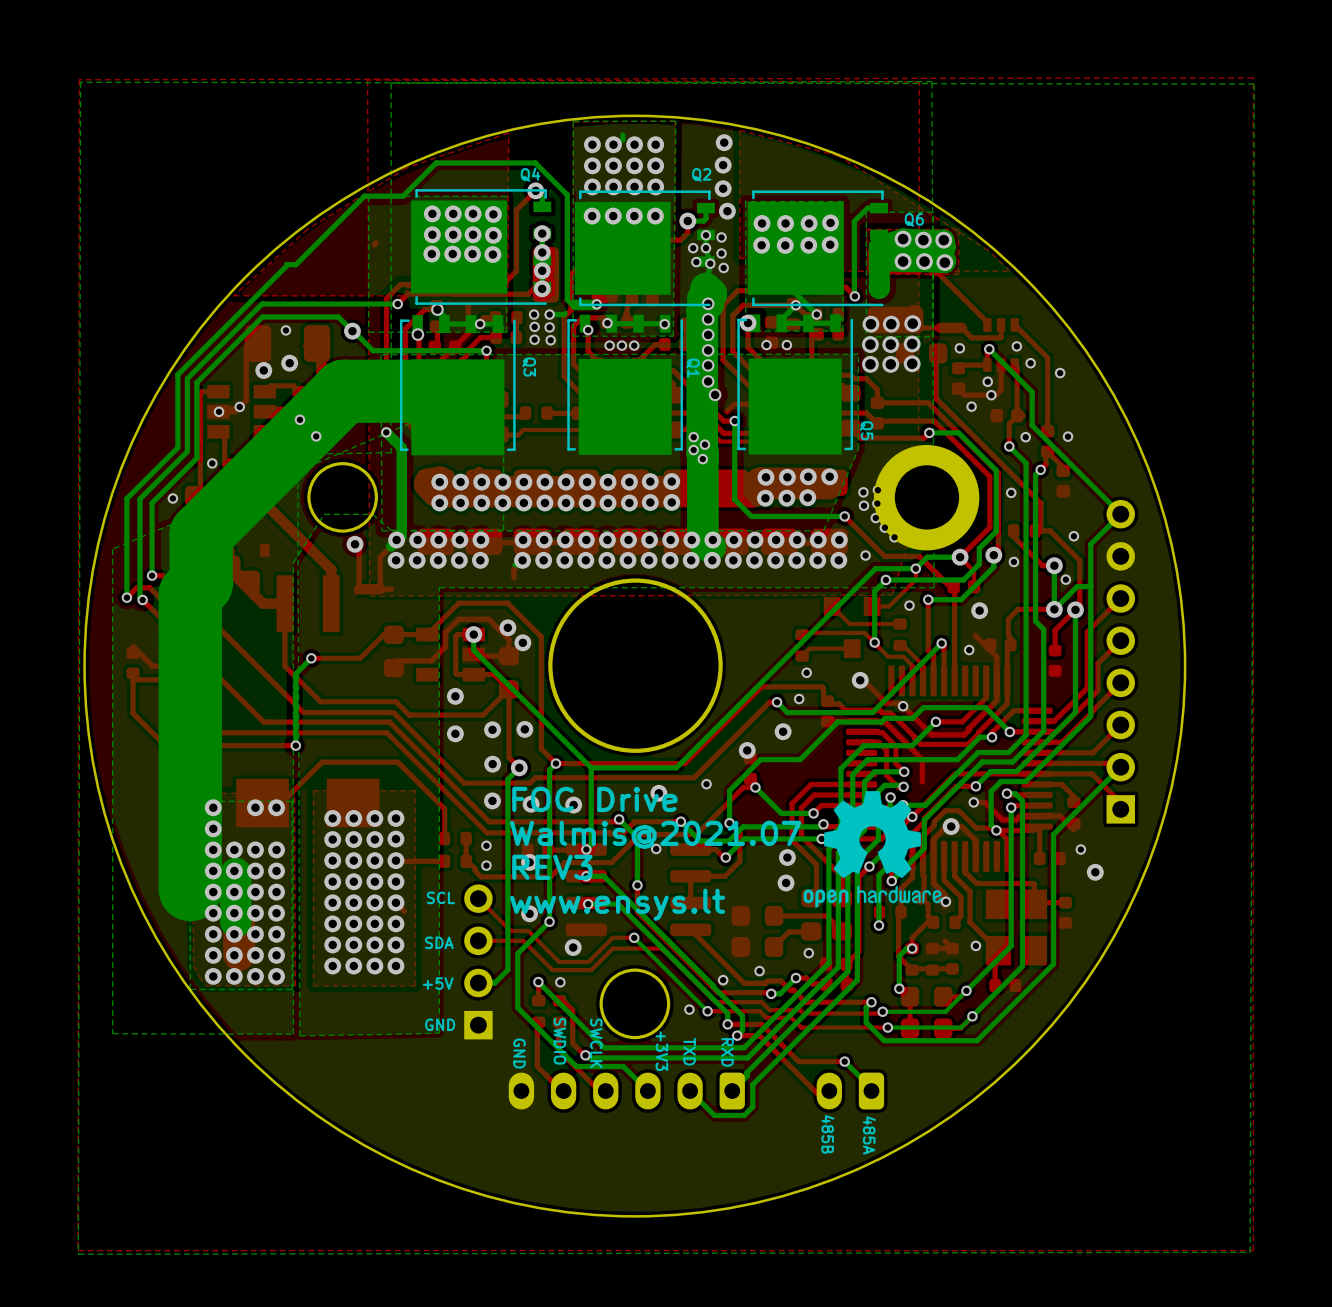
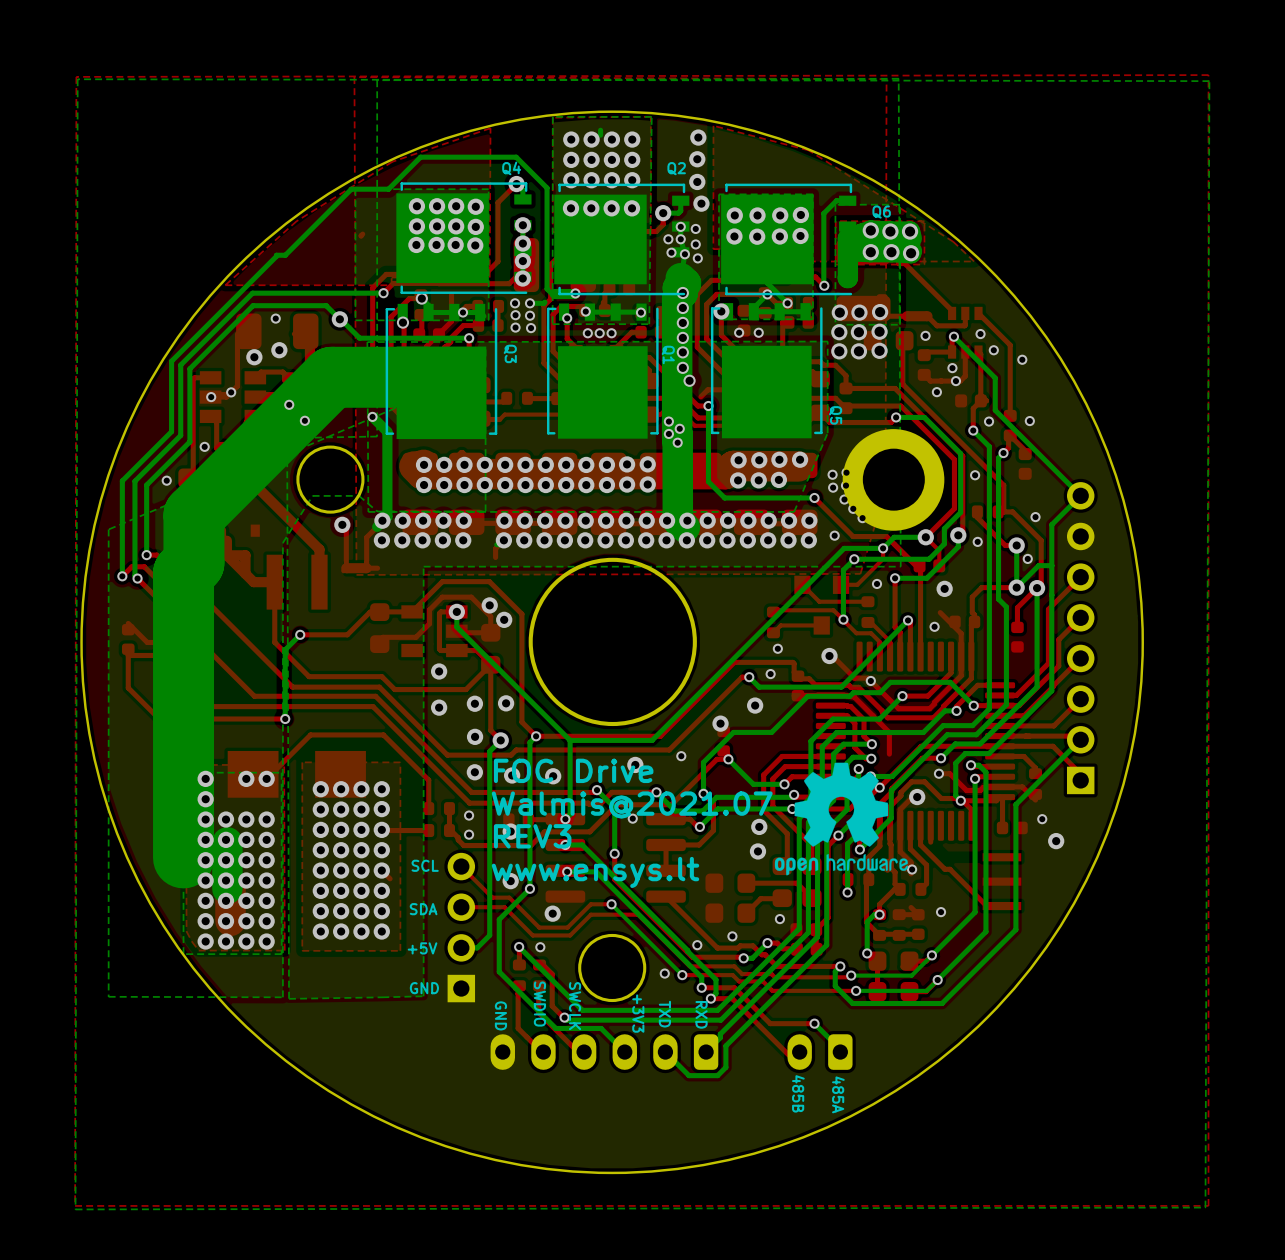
top track: (951, 826) (961, 826) (975, 840) (975, 856) -> none
top track: (965, 872) (976, 883) (1033, 883) (1034, 904) (1035, 902) (1065, 902) -> none
top track: (970, 891) (970, 922) (998, 950) (995, 953) (995, 985) -> (935, 859) (944, 869) (949, 869) (986, 906) (1001, 906)
part: (1065, 912) -> none
part: none -> (1001, 881)
part: (1016, 927) -> none
part: (1005, 985) -> none

